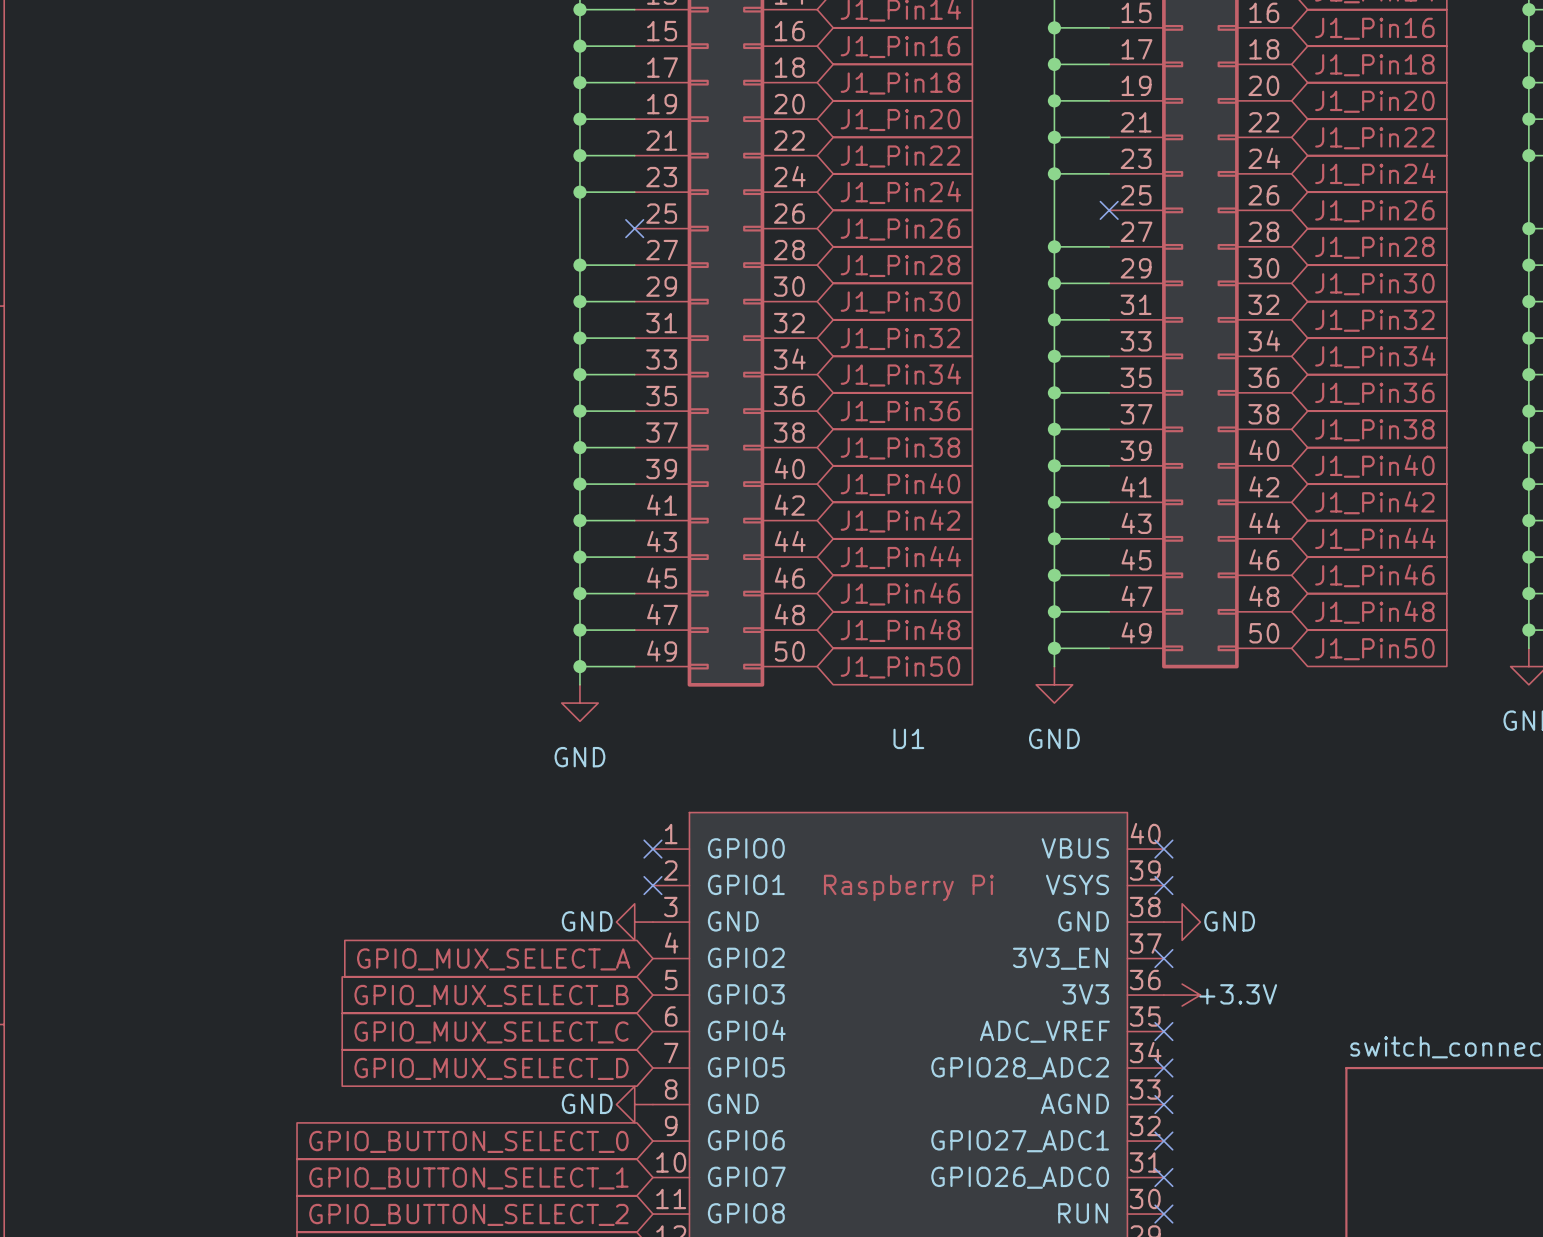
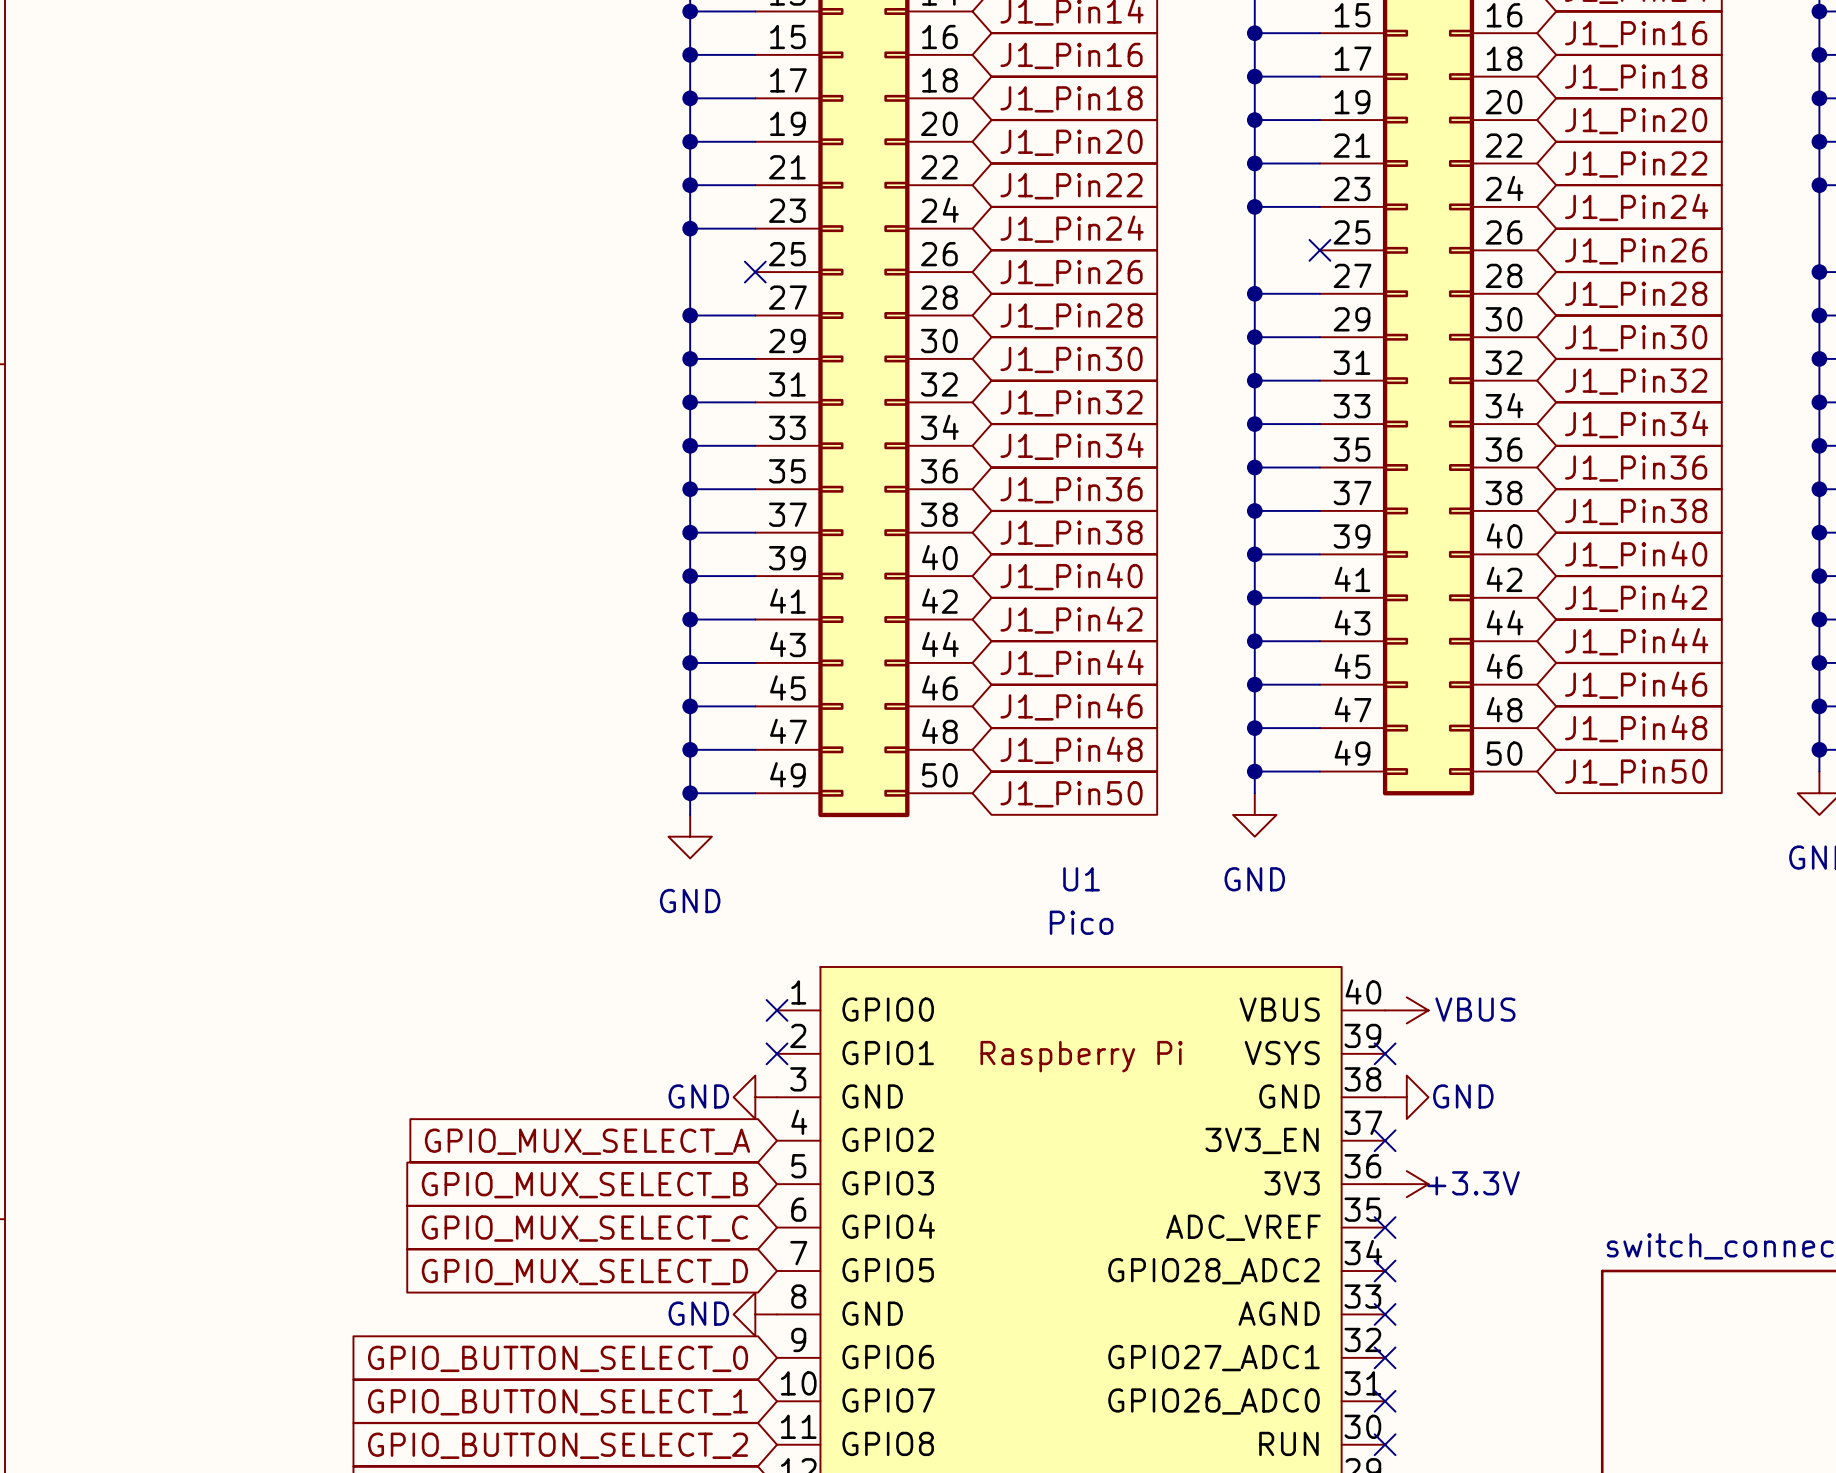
U1 value: none -> Pico (1081, 922)
no-connect mark: (1163, 849) -> none
power symbol: none -> VBUS (1406, 1010)

